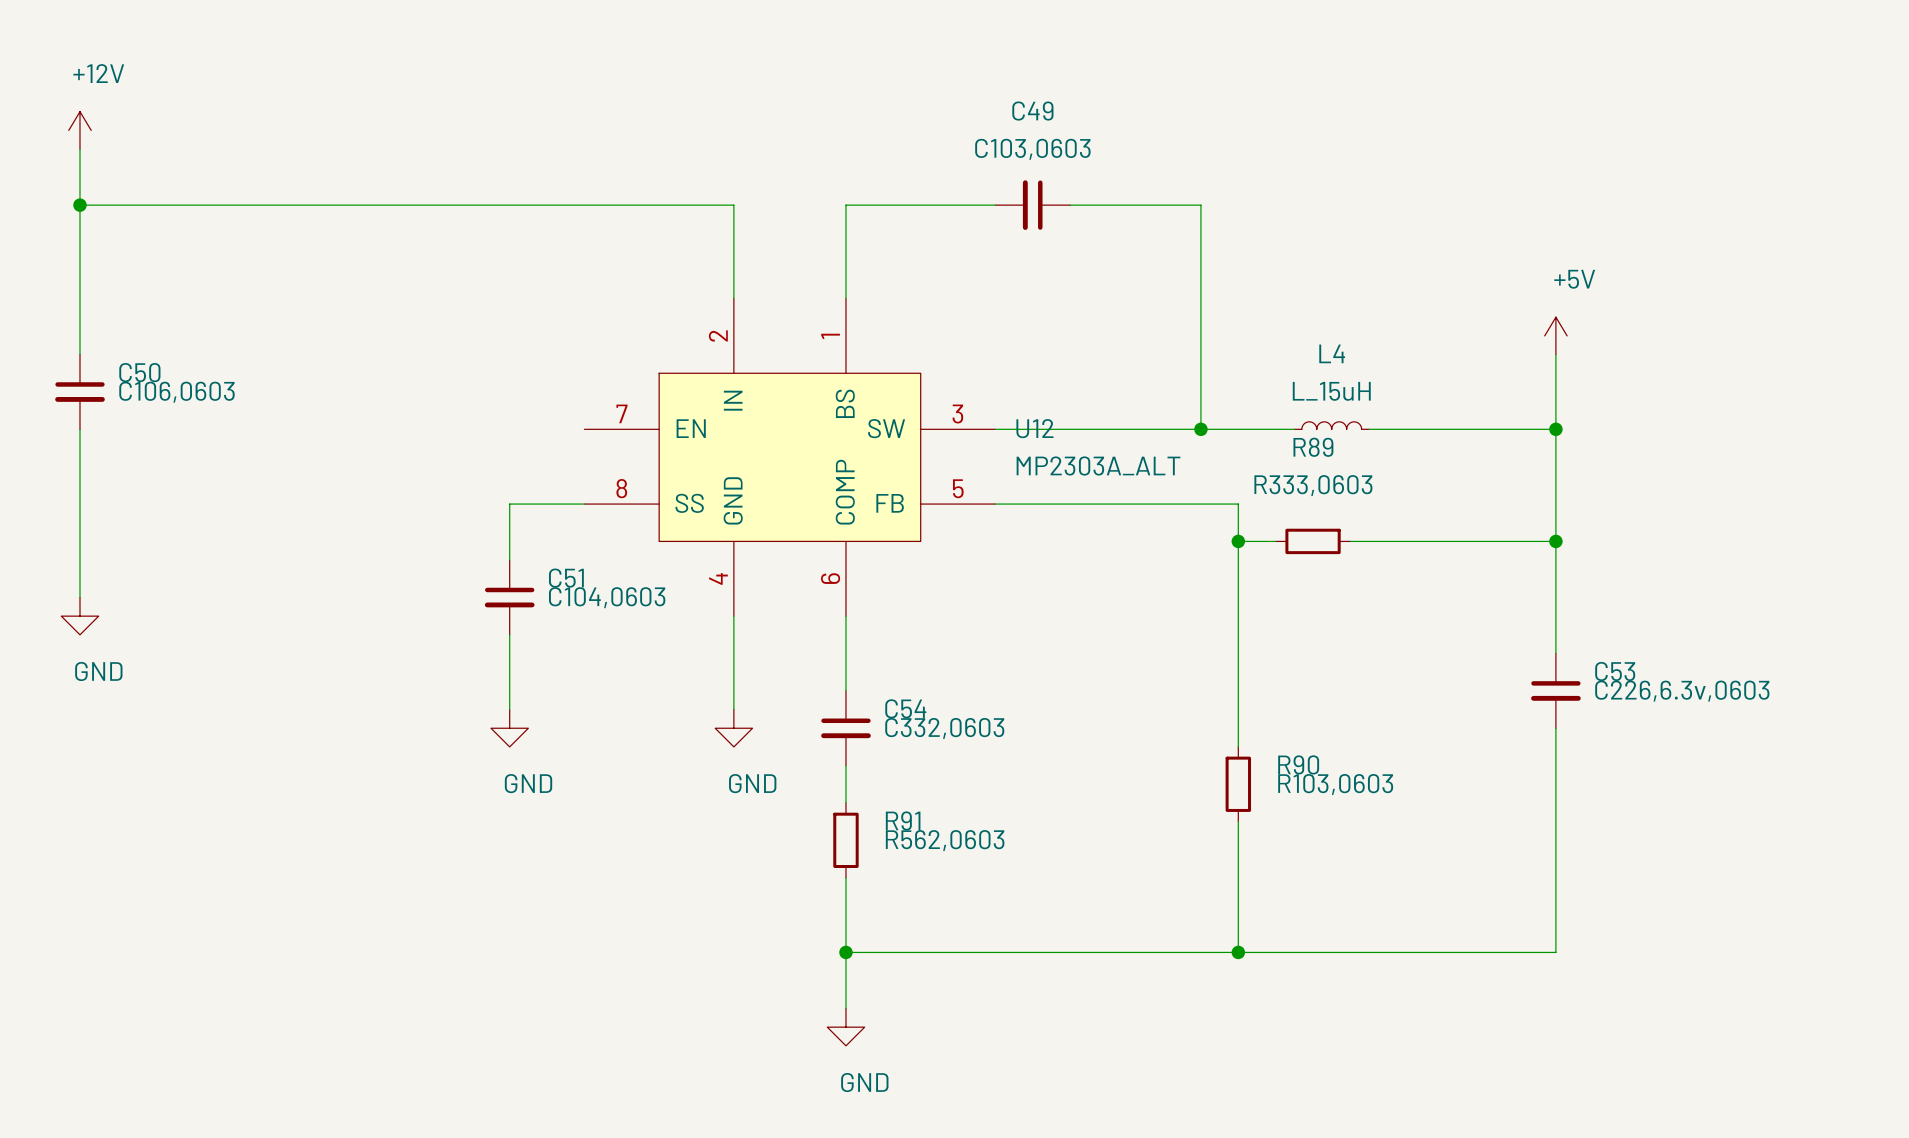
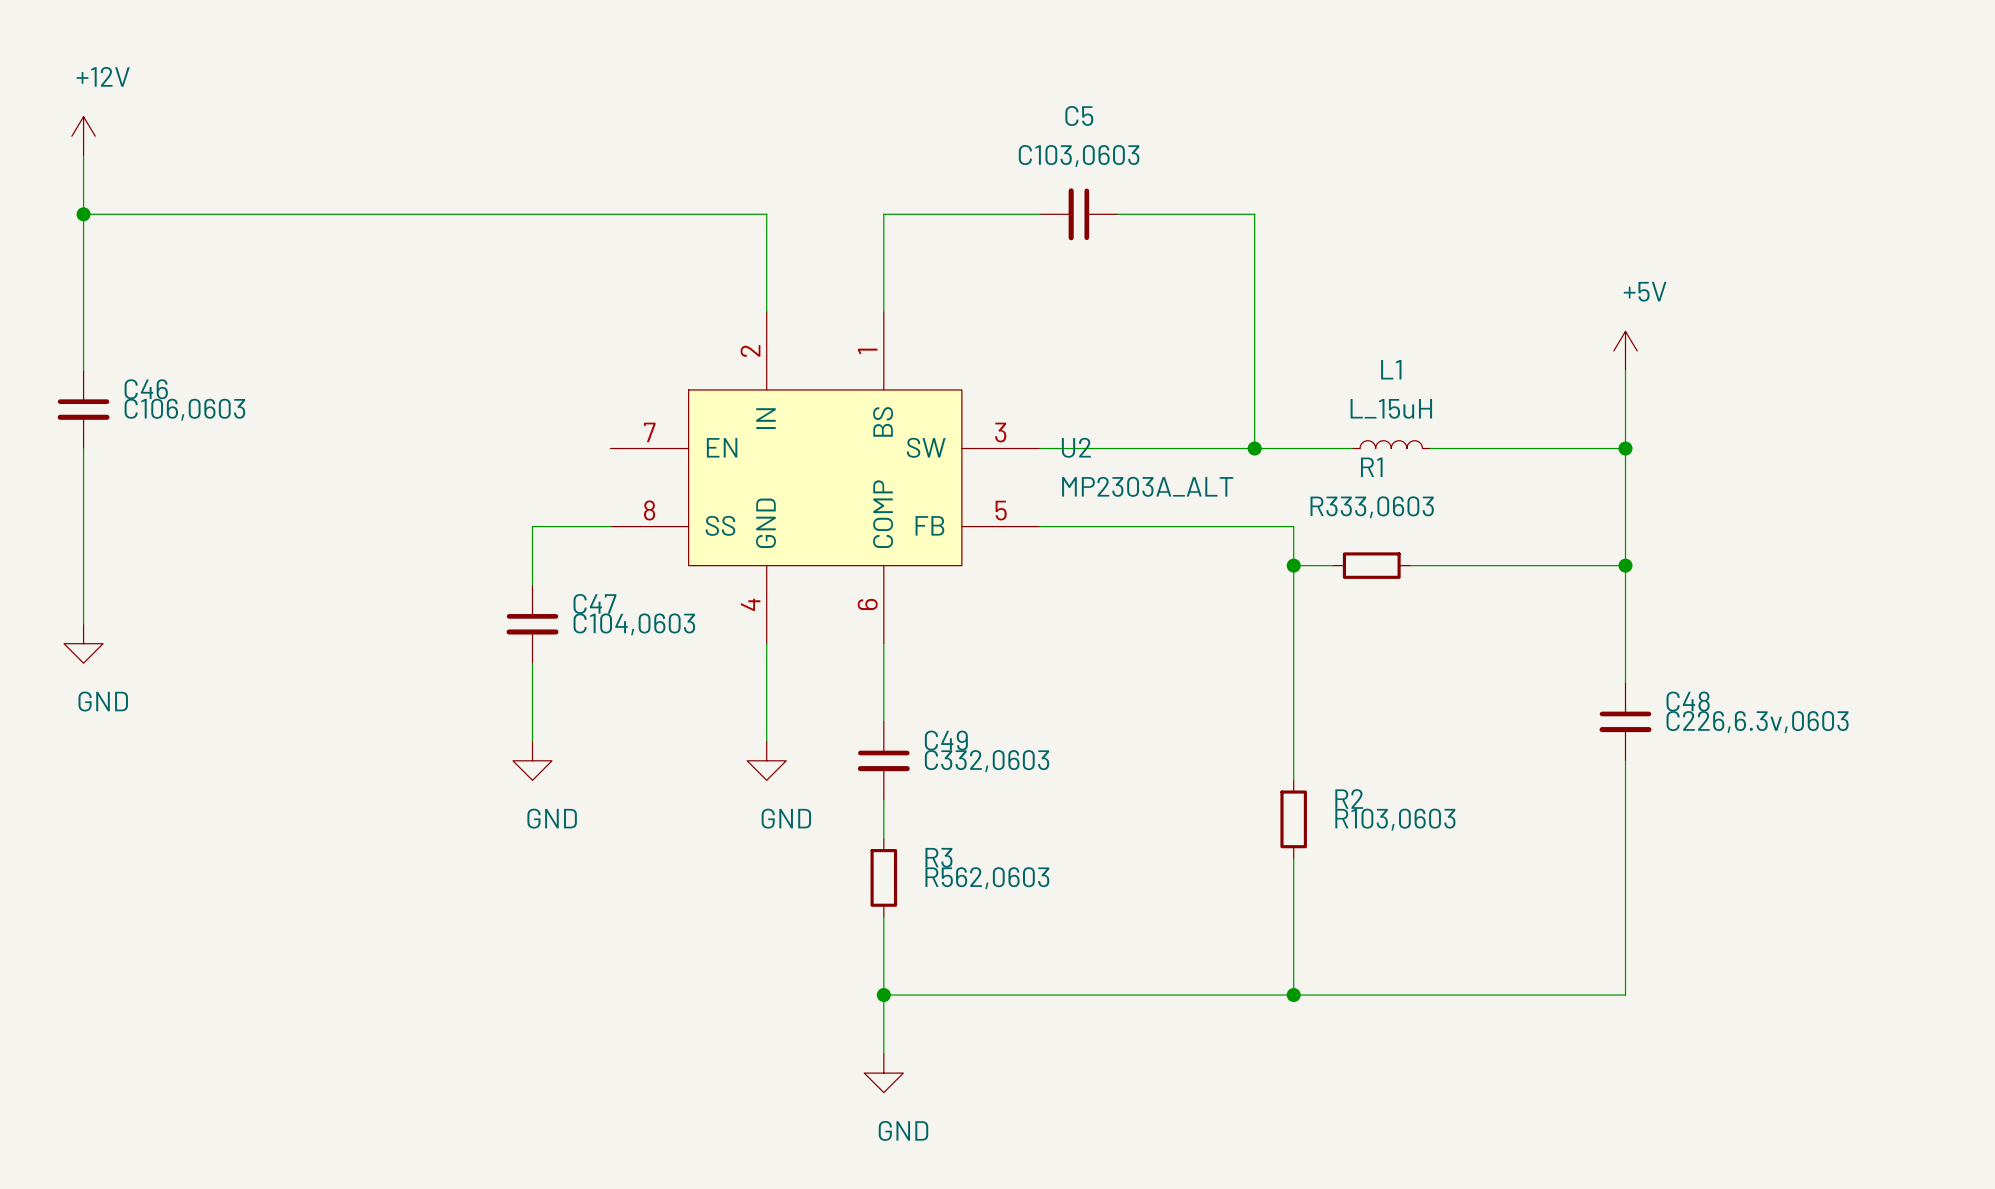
C49 name: C49 (1032, 111) -> C5 (1079, 116)
L4 name: L4 (1332, 353) -> L1 (1391, 369)
C50 name: C50 (139, 372) -> C46 (146, 389)
U12 name: U12 (1034, 428) -> U2 (1076, 447)
R89 name: R89 (1313, 447) -> R1 (1371, 467)
C51 name: C51 (566, 578) -> C47 (594, 603)
C53 name: C53 (1615, 671) -> C48 (1688, 701)
C54 name: C54 (905, 708) -> C49 (946, 740)
R90 name: R90 (1298, 764) -> R2 (1349, 799)
R91 name: R91 (903, 820) -> R3 (938, 857)

